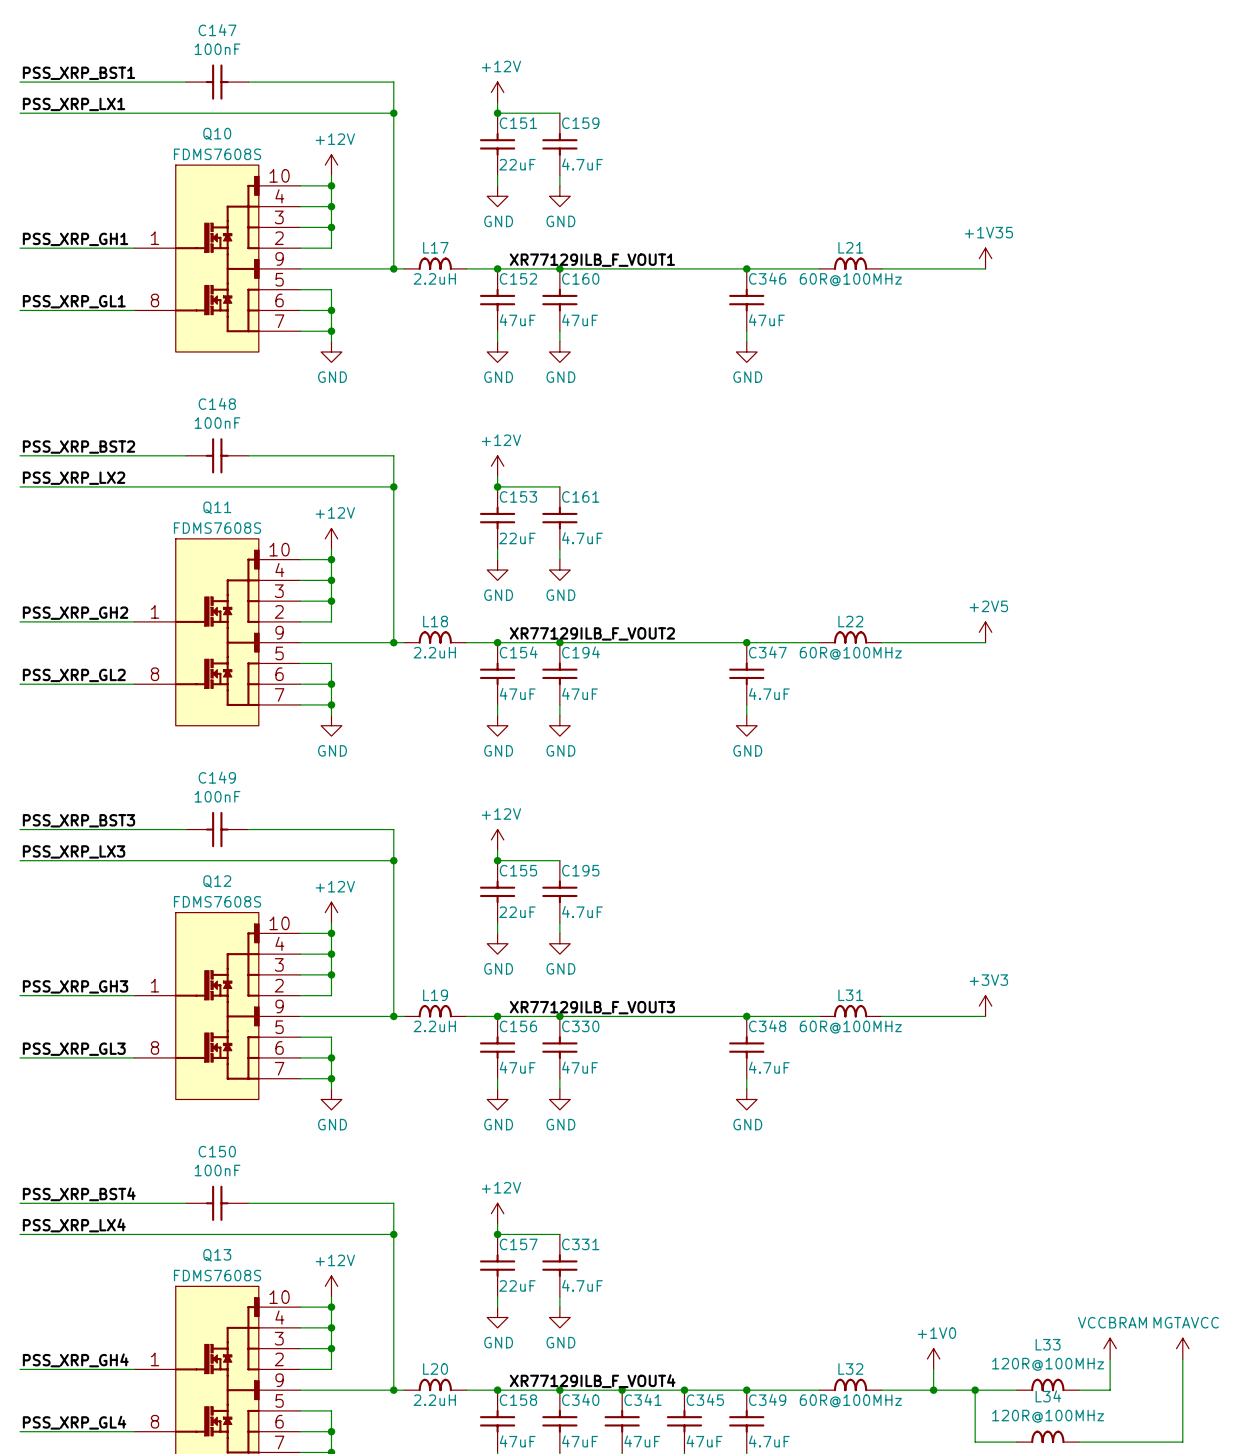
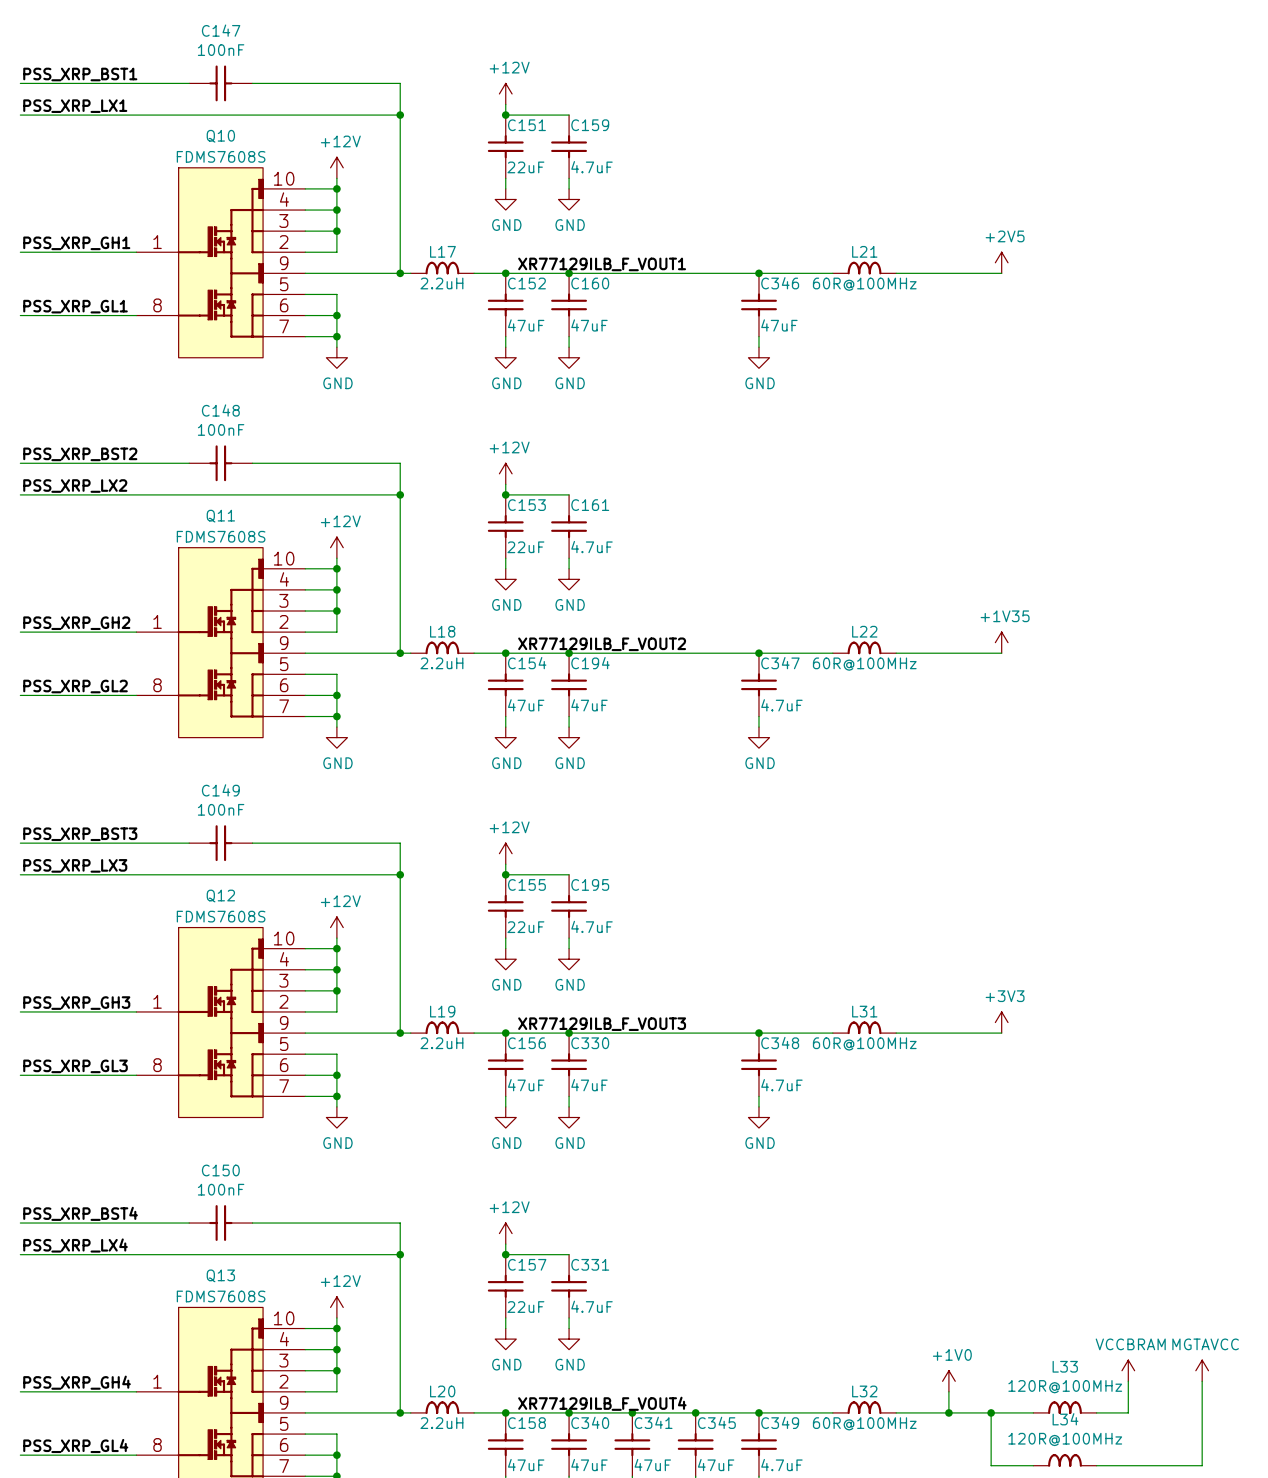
power symbol: +1V35 (985, 258) -> +2V5 (1001, 262)
power symbol: +2V5 (985, 632) -> +1V35 (1001, 642)

